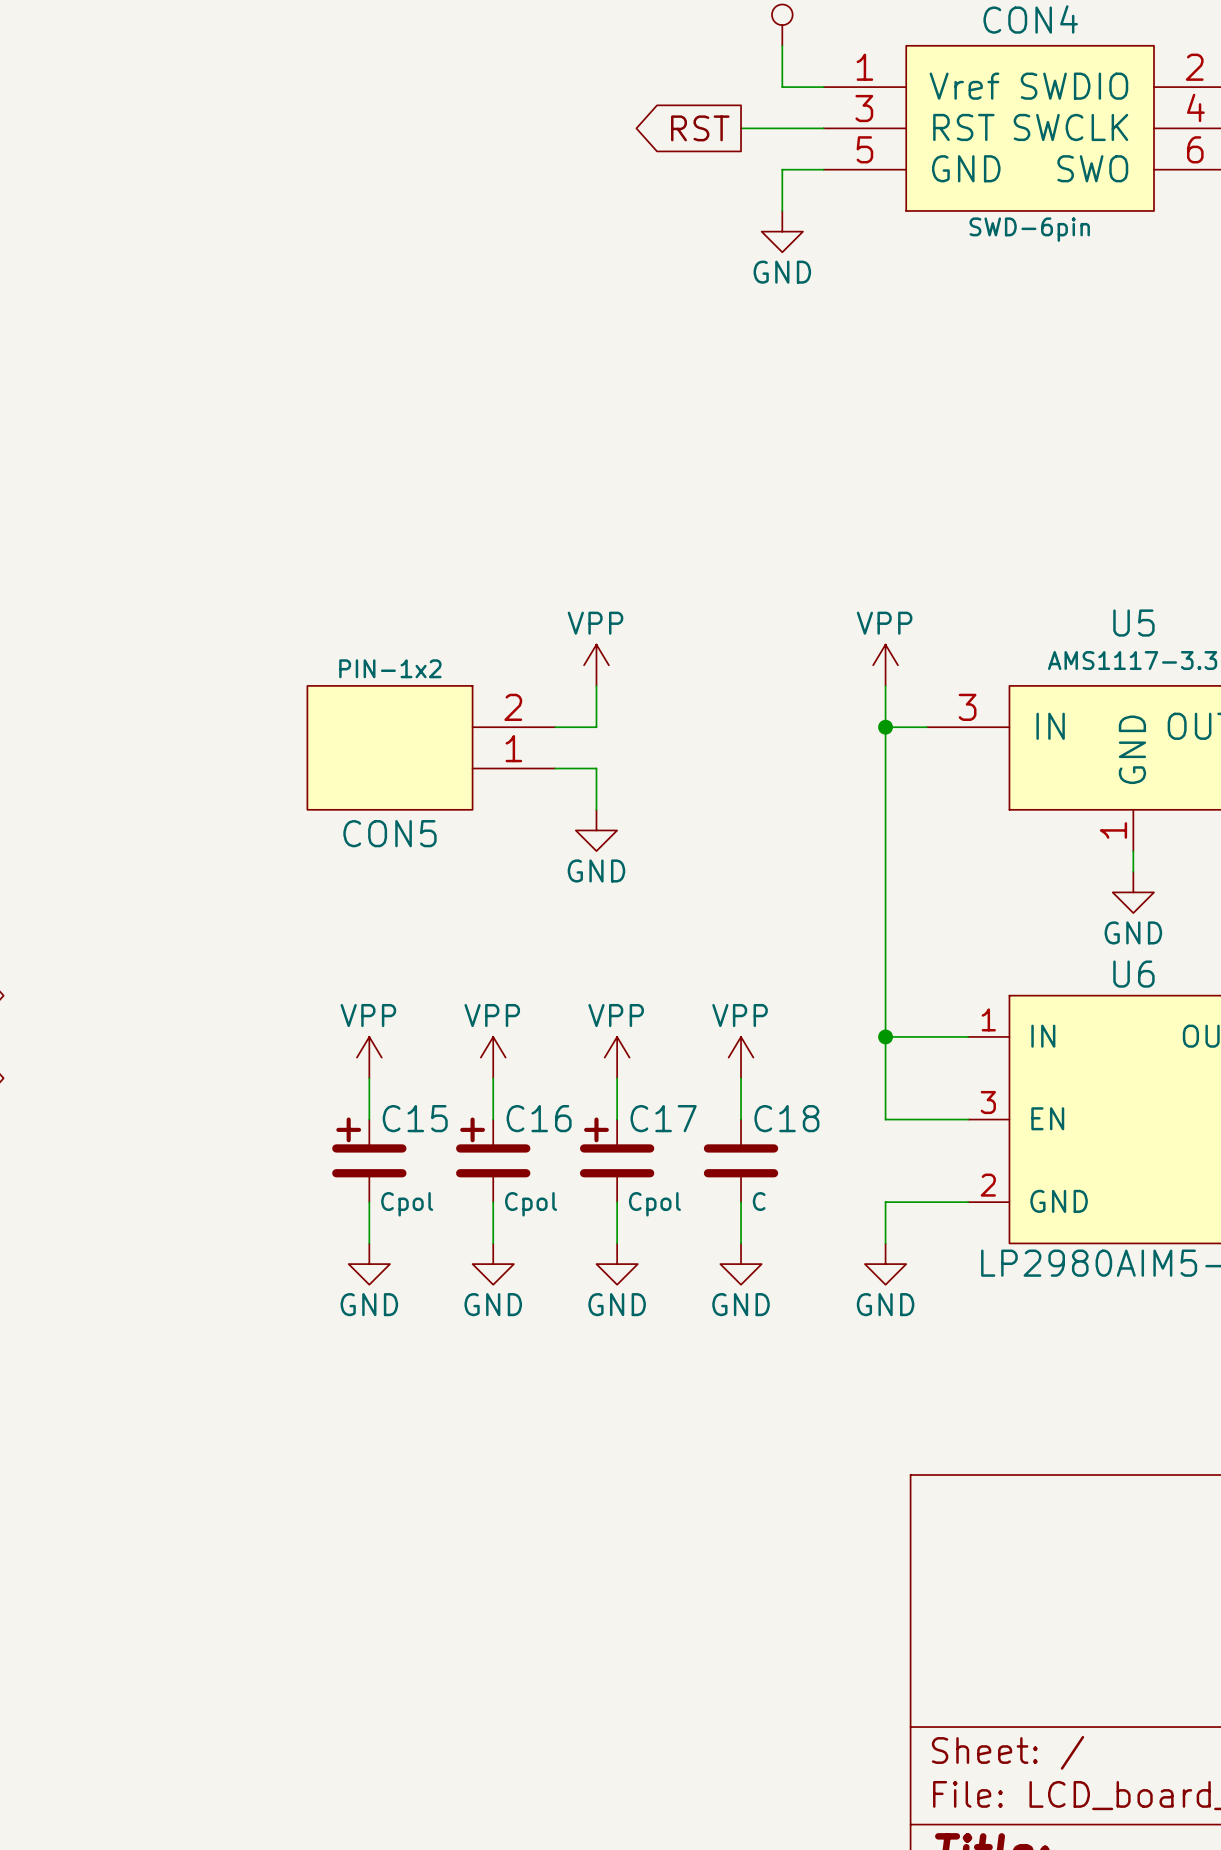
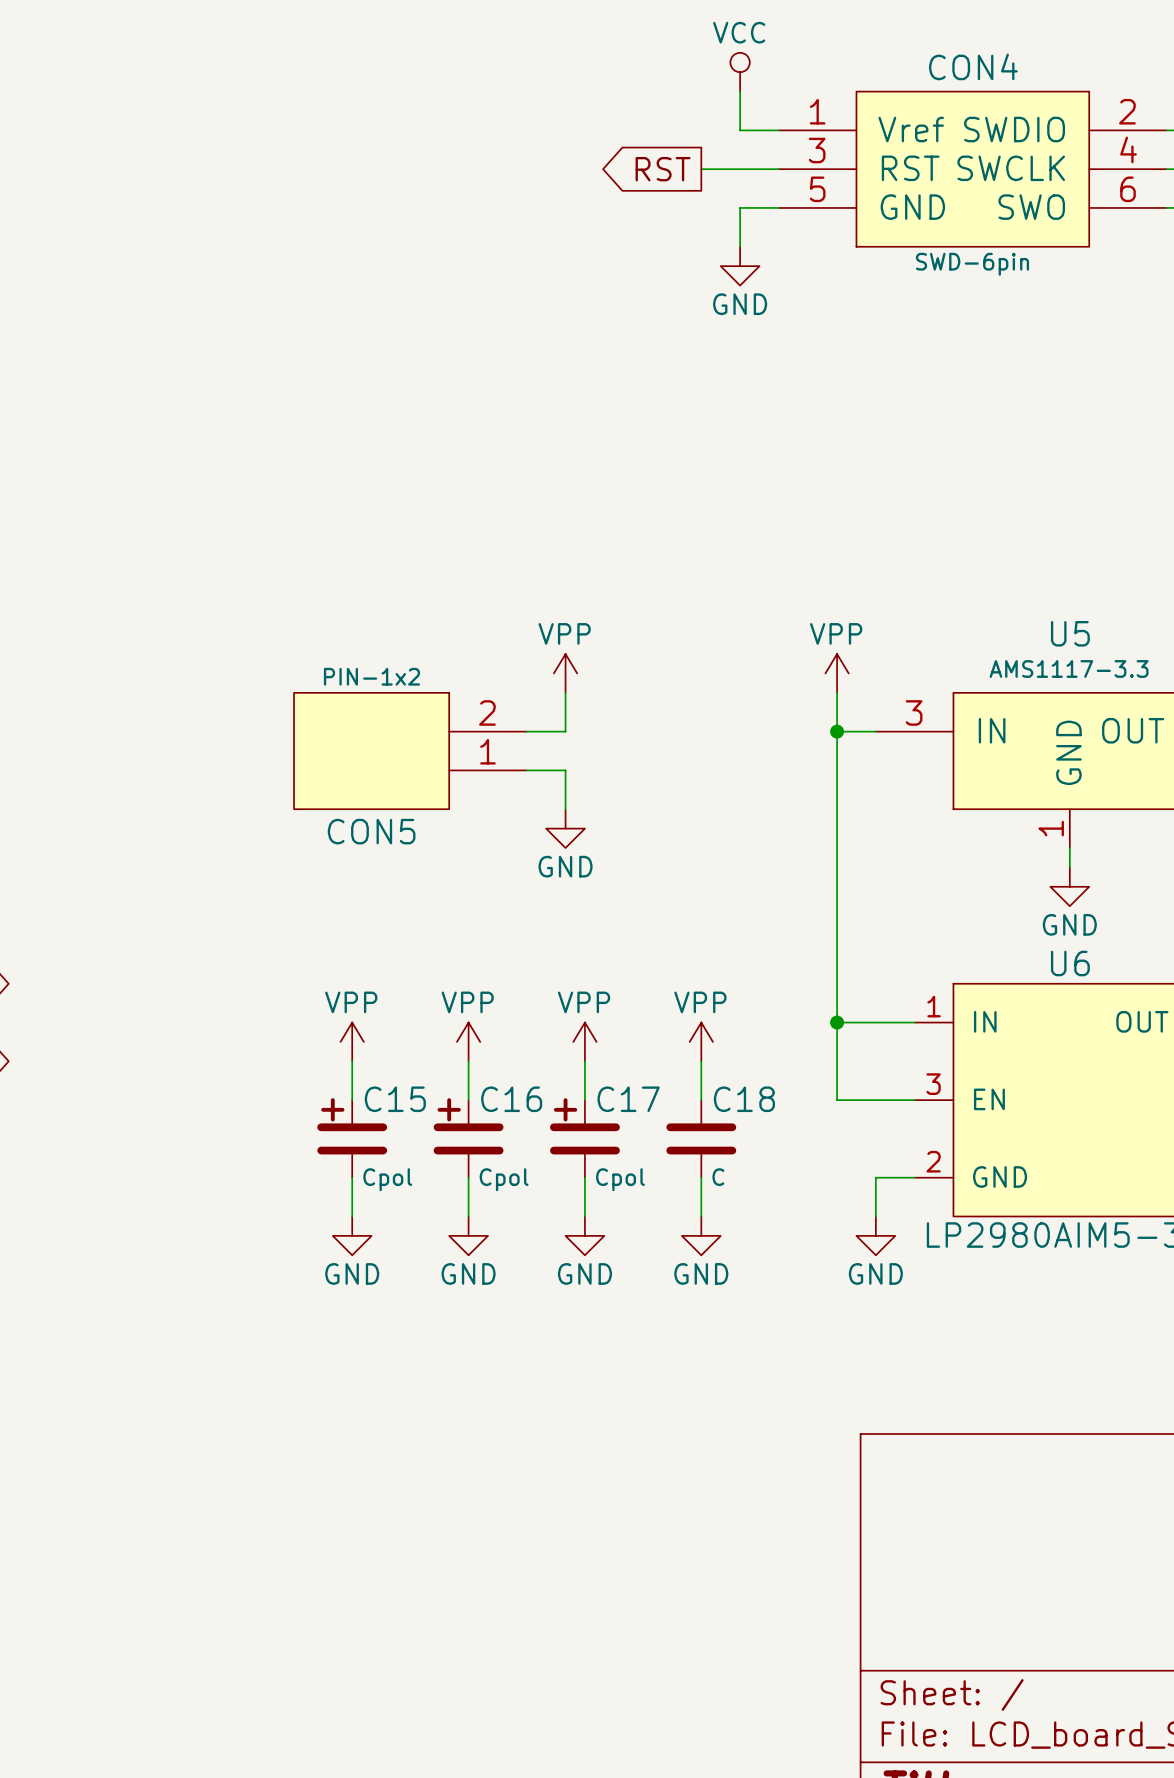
wire: (926, 1202) (885, 1202) (885, 1243) -> (875, 1177) (875, 1216)
power symbol position: GND (885, 1264) -> GND (875, 1235)

